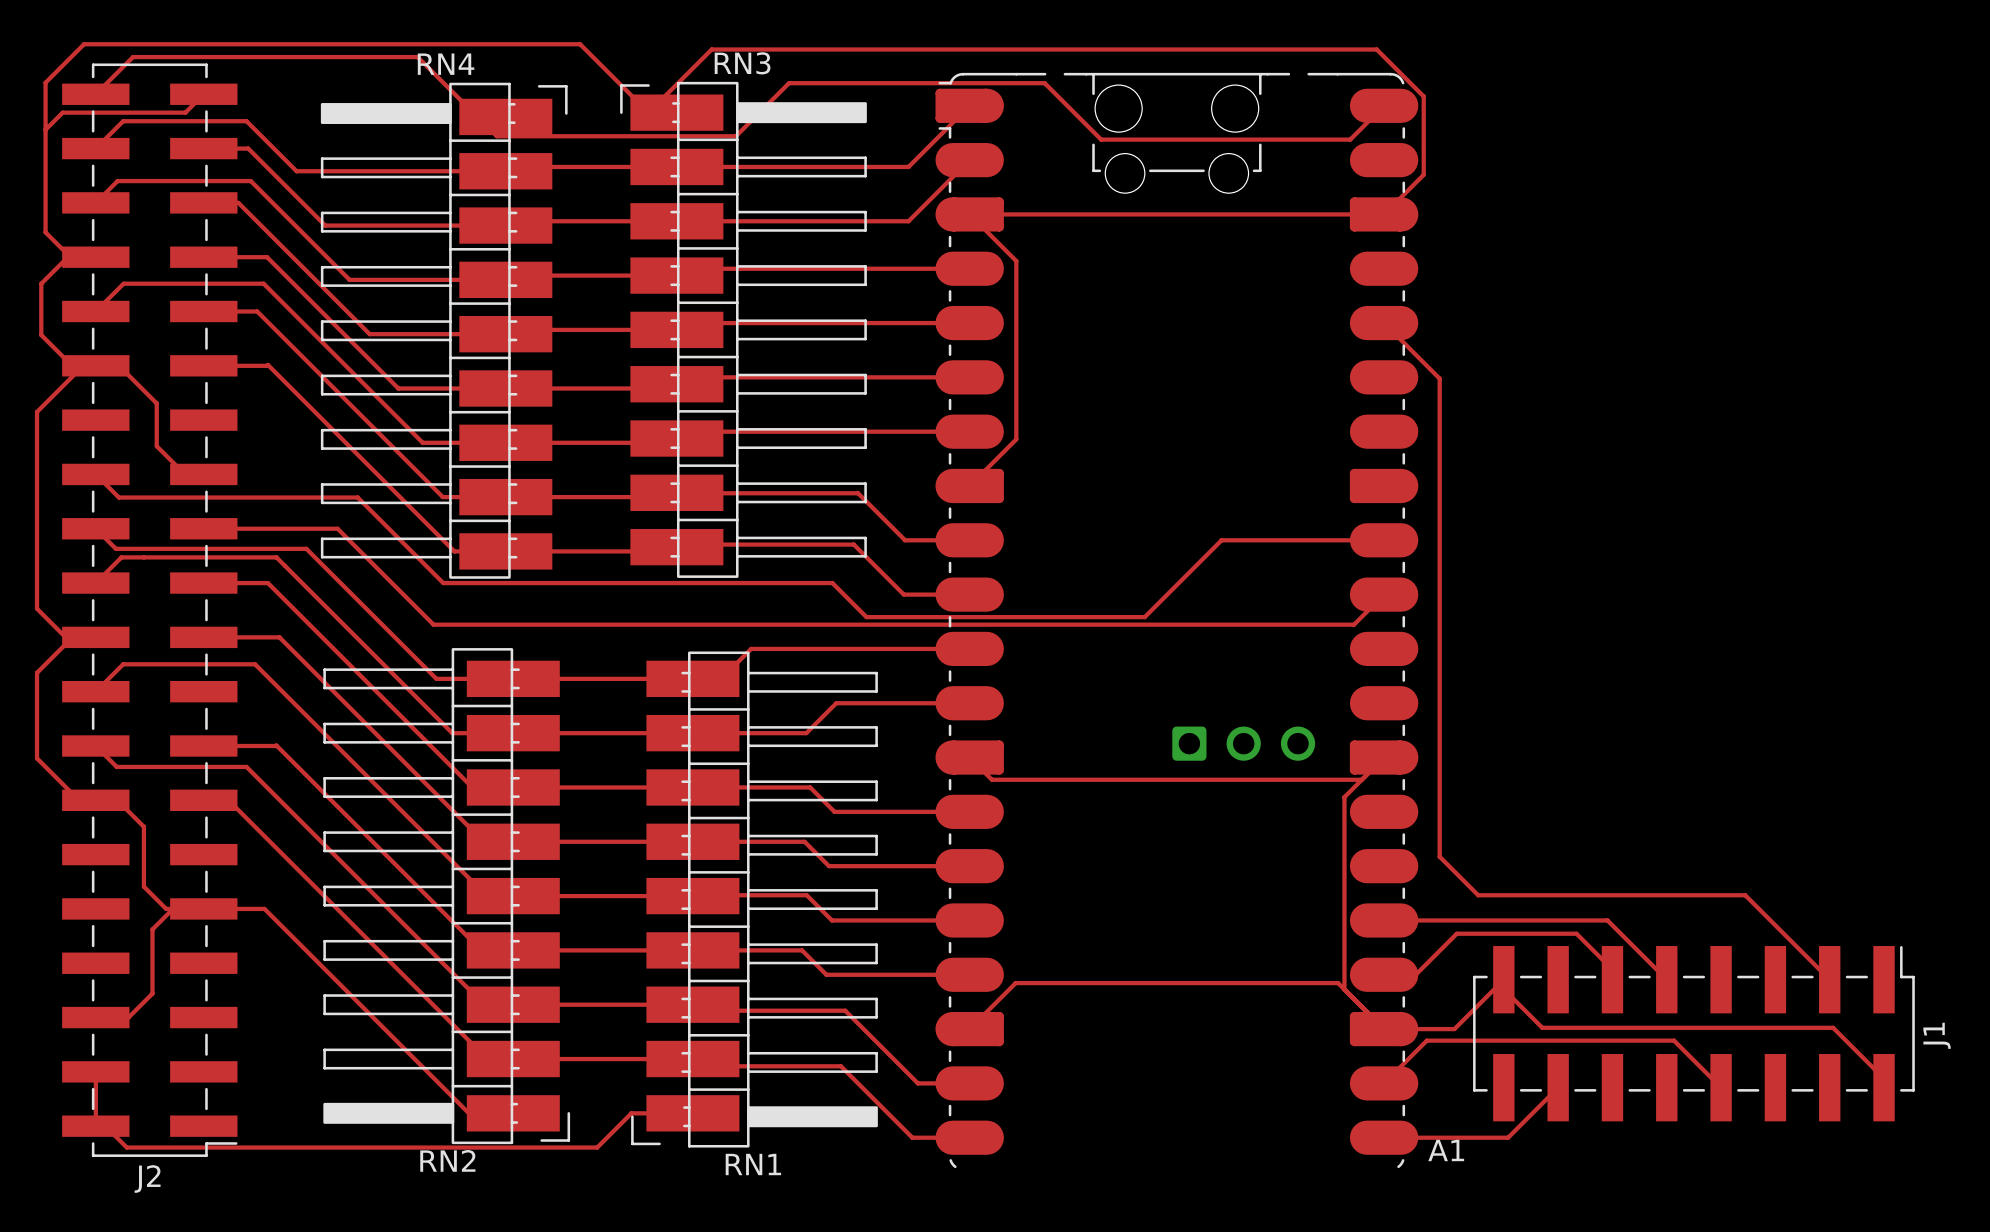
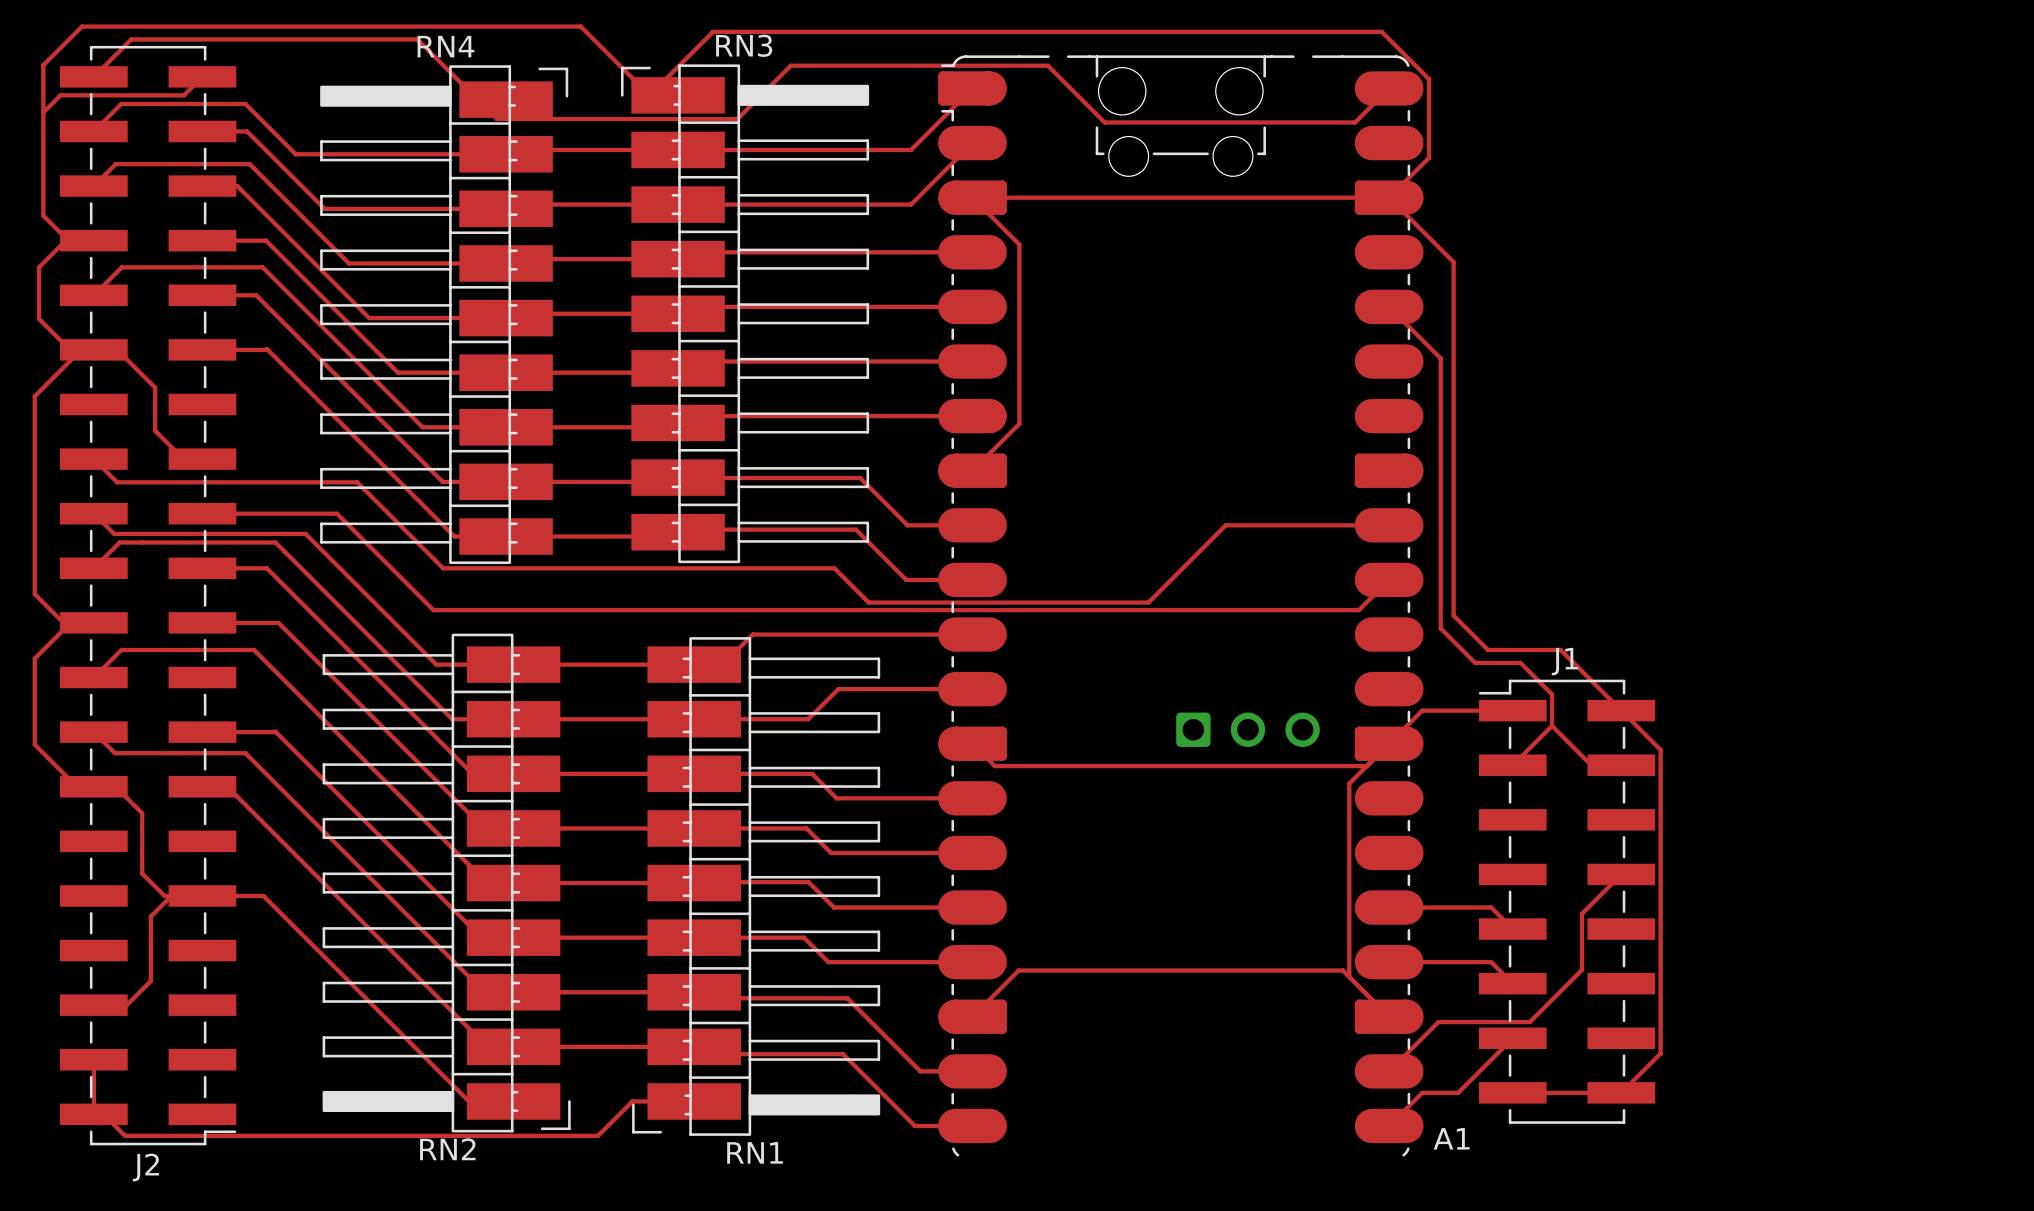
track: none -> (1389, 197) (1453, 262) (1453, 615) (1488, 650) (1560, 650) (1660, 749) (1660, 1053) (1621, 1092) (1512, 1092)
track: (1435, 374) (1439, 378) (1439, 856) (1478, 895) (1745, 895) (1829, 979) -> (1440, 358) (1440, 628) (1475, 662) (1520, 662) (1552, 694) (1552, 725)
track: none -> (1512, 710) (1422, 710) (1389, 743)
track: none -> (1552, 725) (1512, 765)
track: none -> (1552, 725) (1591, 765) (1621, 765)
track: (1485, 920) (1607, 920) (1666, 979) -> (1491, 907) (1512, 929)
track: (1415, 974) (1456, 933) (1576, 933) (1612, 969) (1612, 979) -> (1420, 962) (1491, 962) (1512, 983)
track: (1384, 1029) (1454, 1029) (1503, 979) (1503, 989) (1542, 1027) (1833, 1027) (1884, 1078) (1884, 1087) -> none
J1 rotation: 0° (1693, 1033) -> 90° counterclockwise (1567, 901)
track: (1426, 1040) (1674, 1040) (1721, 1087) -> (1432, 1028) (1438, 1022) (1529, 1022) (1582, 969) (1582, 913) (1621, 874)
track: (1558, 1087) (1508, 1137) (1384, 1137) -> (1512, 1038) (1458, 1092) (1422, 1092) (1389, 1125)

